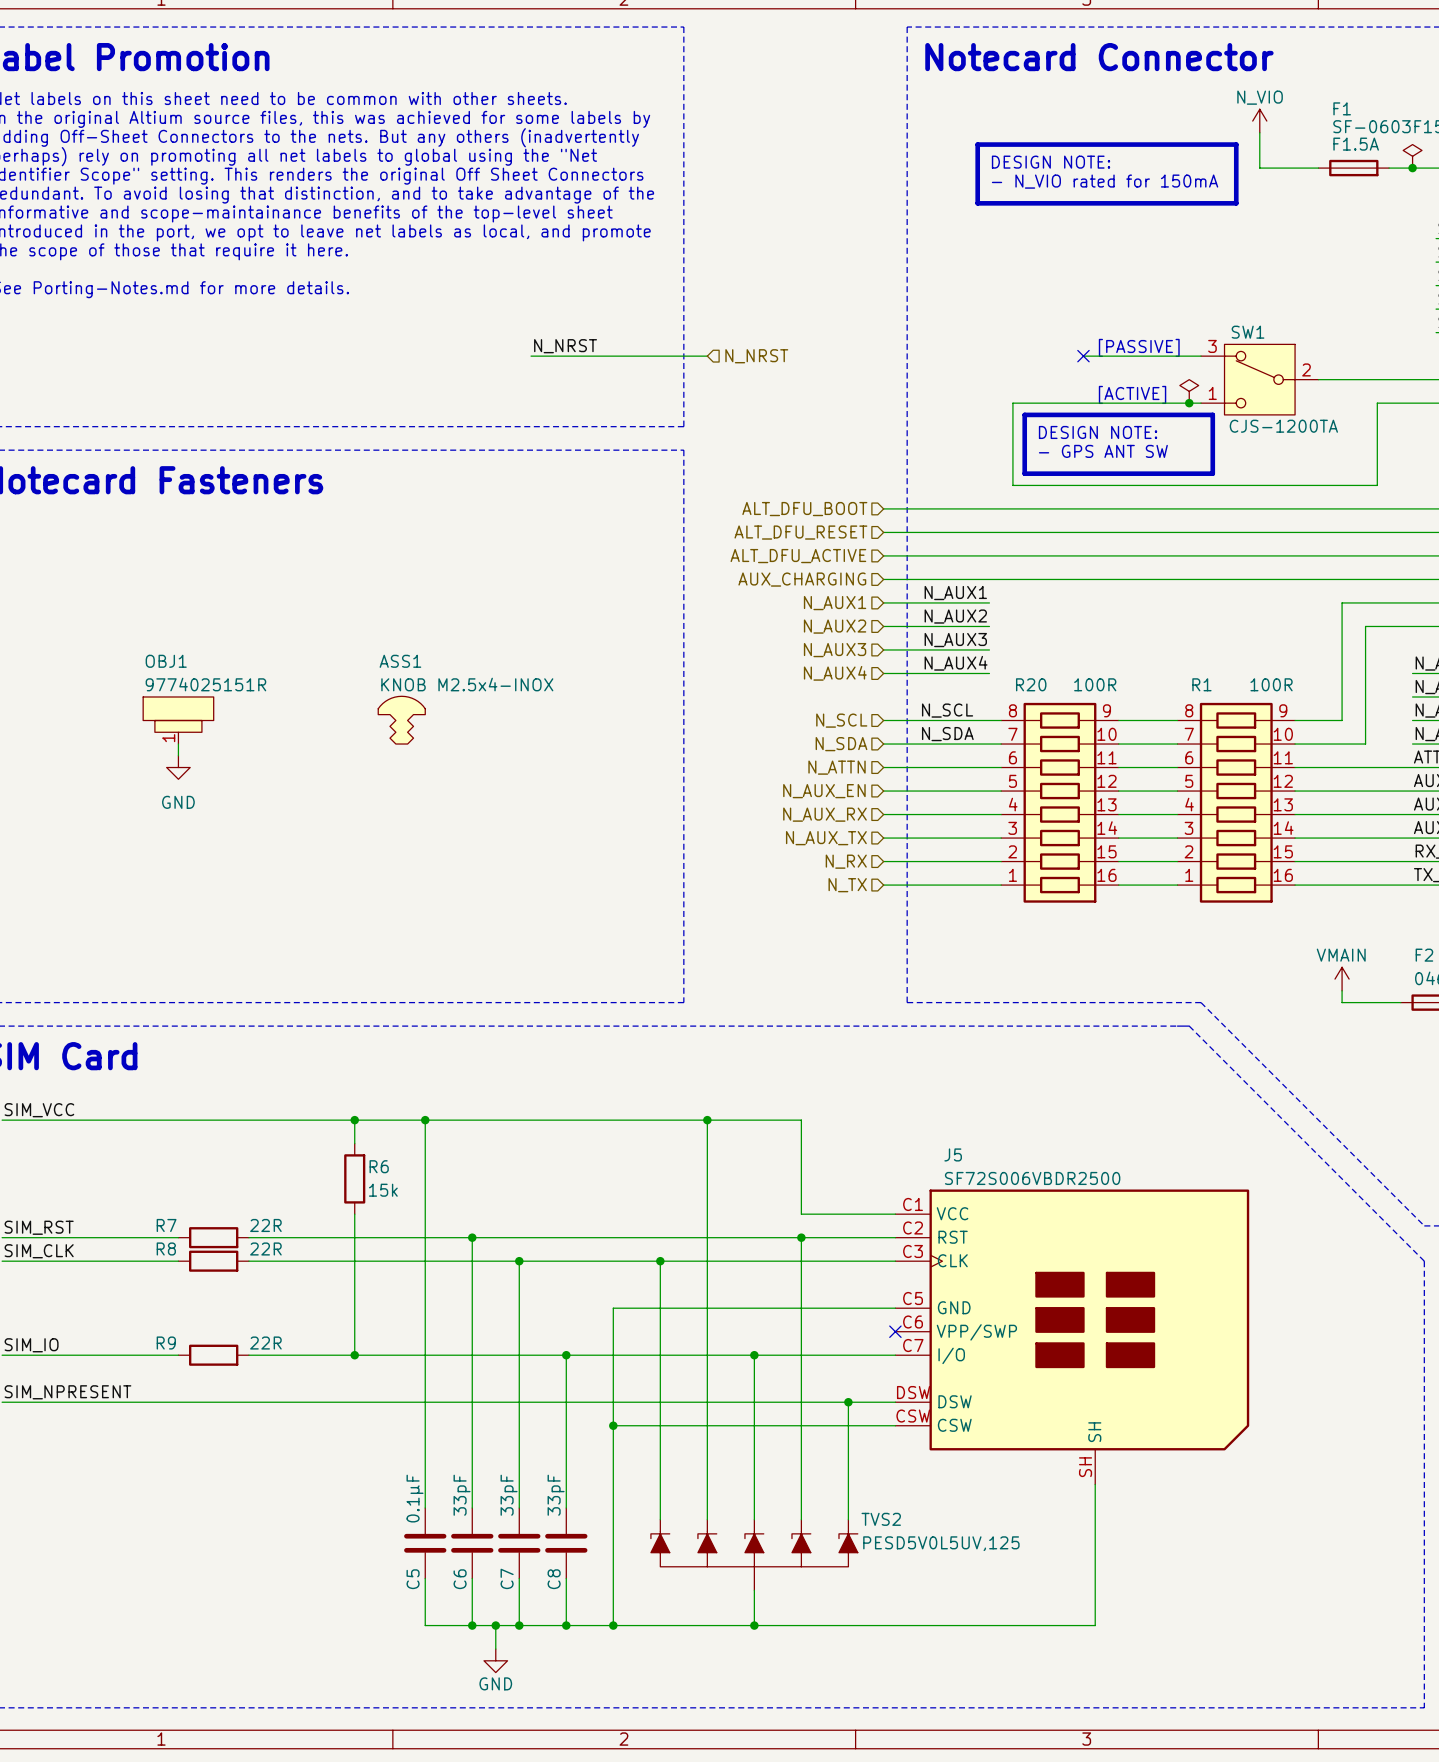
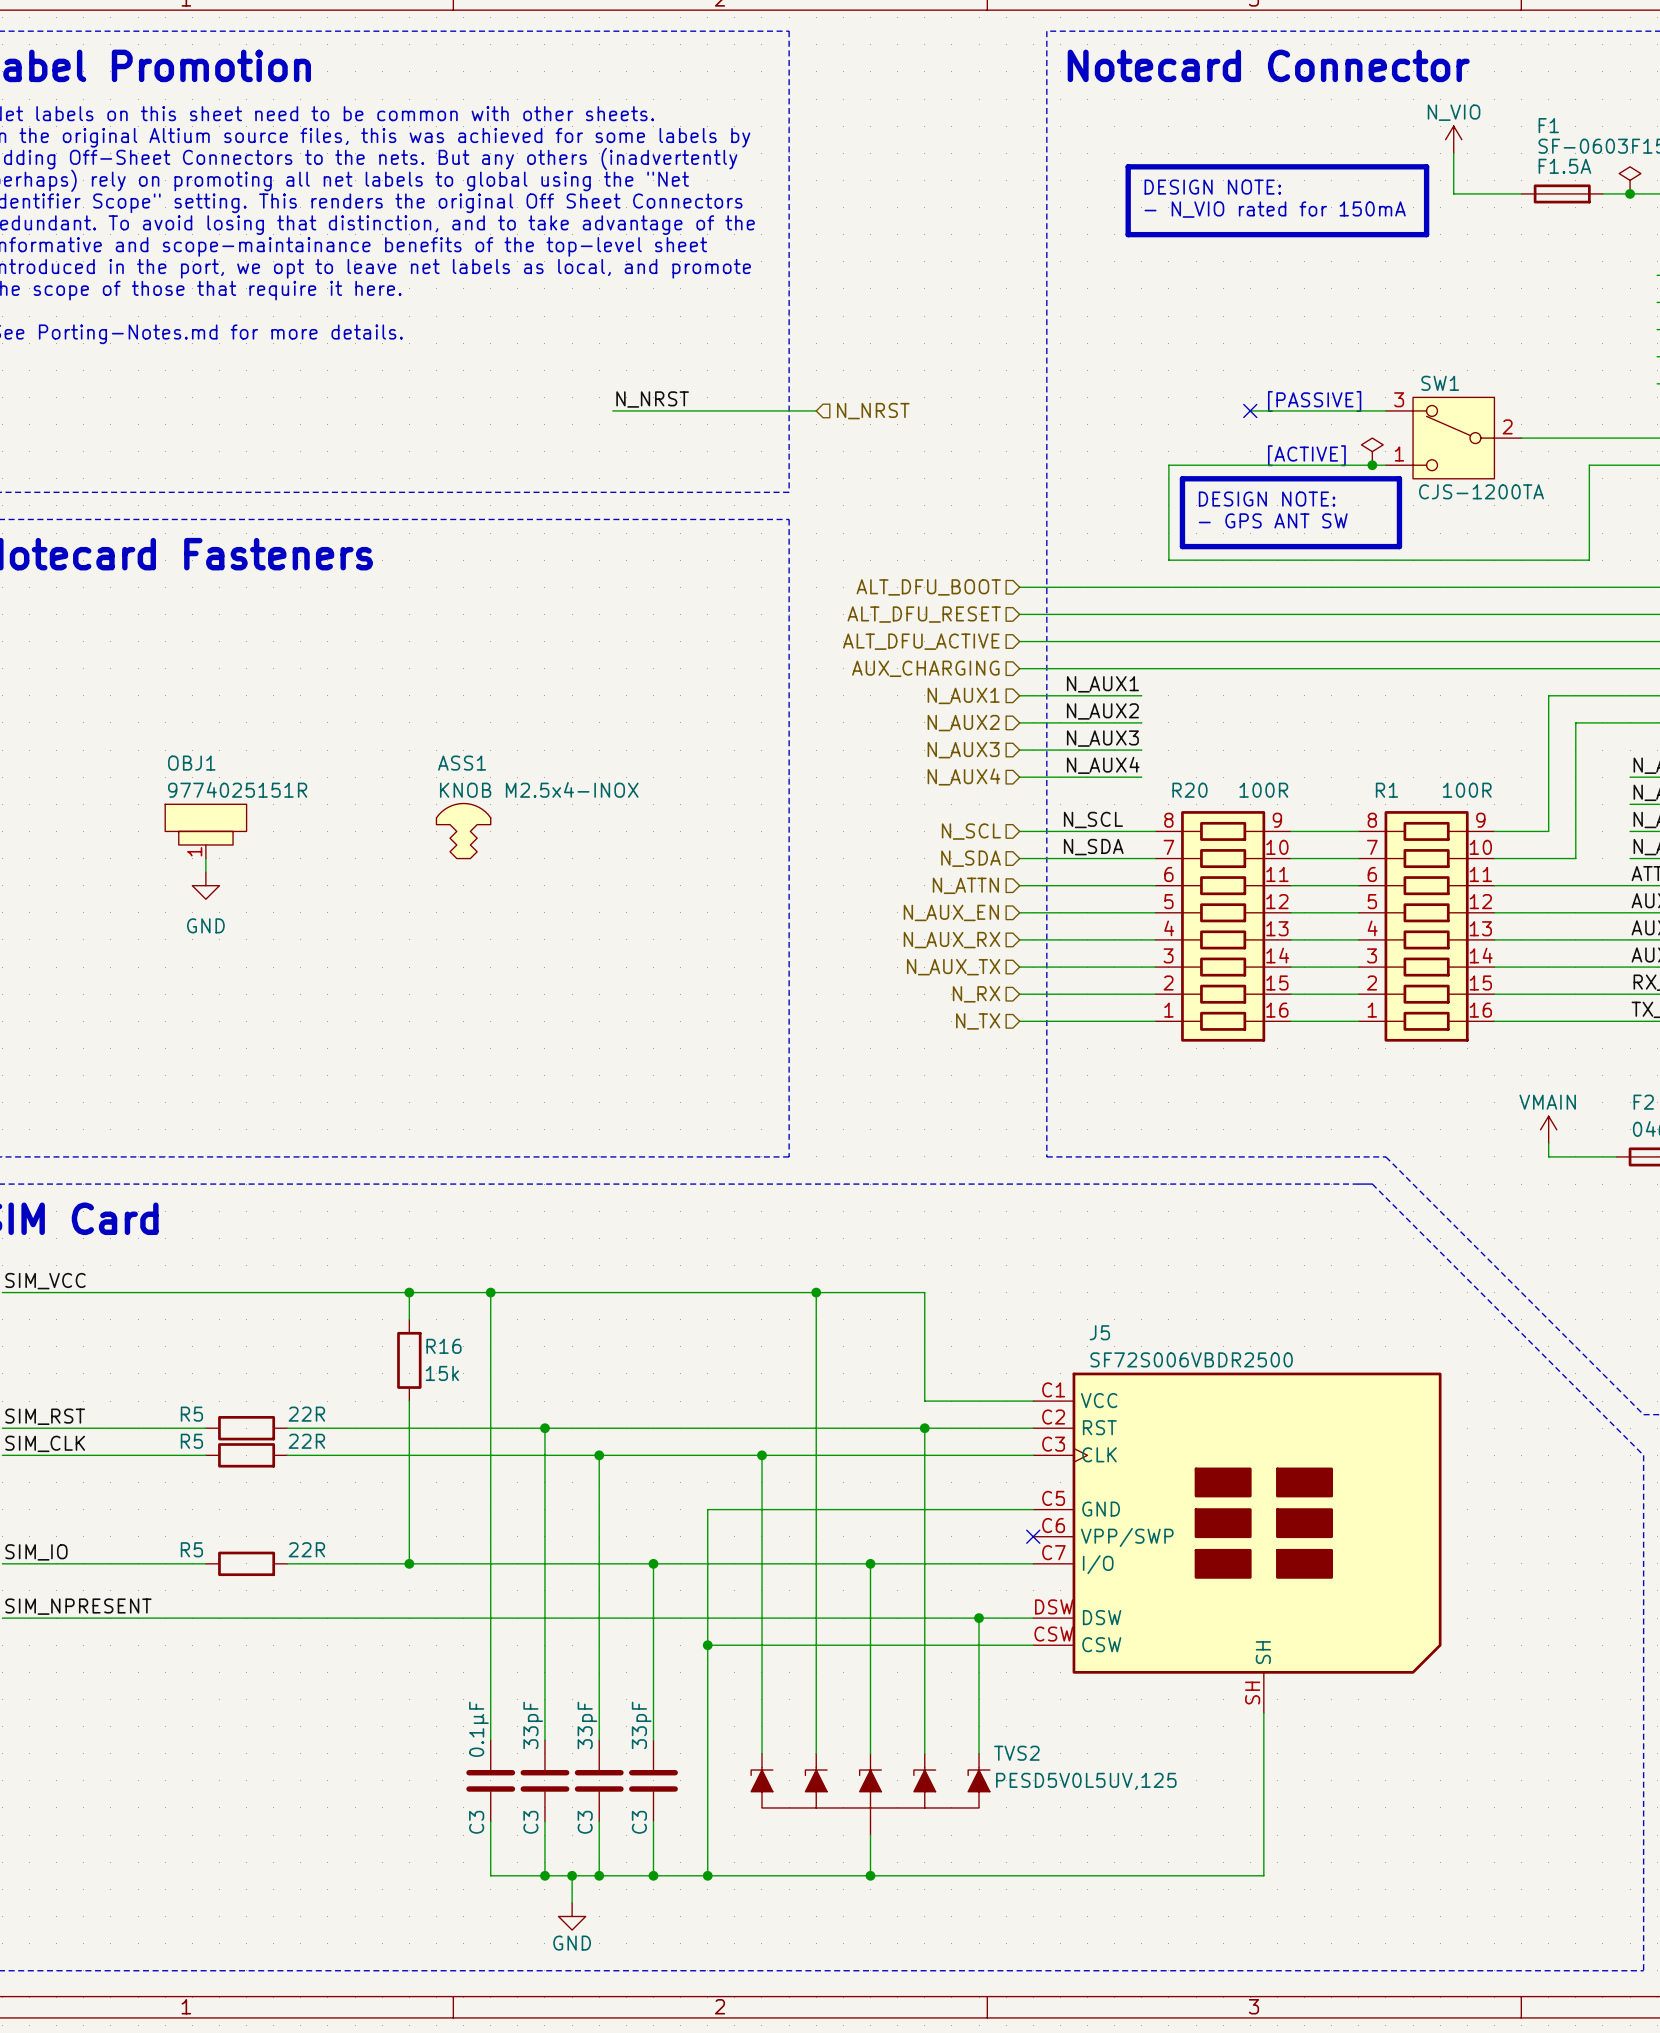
R6 name: R6 (379, 1166) -> R16 (444, 1346)
R7 name: R7 (166, 1225) -> R5 (191, 1414)
R8 name: R8 (166, 1248) -> R5 (191, 1441)
R9 name: R9 (166, 1343) -> R5 (191, 1549)
C7 name: C7 (507, 1578) -> C3 (585, 1822)
C5 name: C5 (413, 1579) -> C3 (476, 1822)
C6 name: C6 (460, 1579) -> C3 (530, 1822)
C8 name: C8 (554, 1579) -> C3 (639, 1822)

